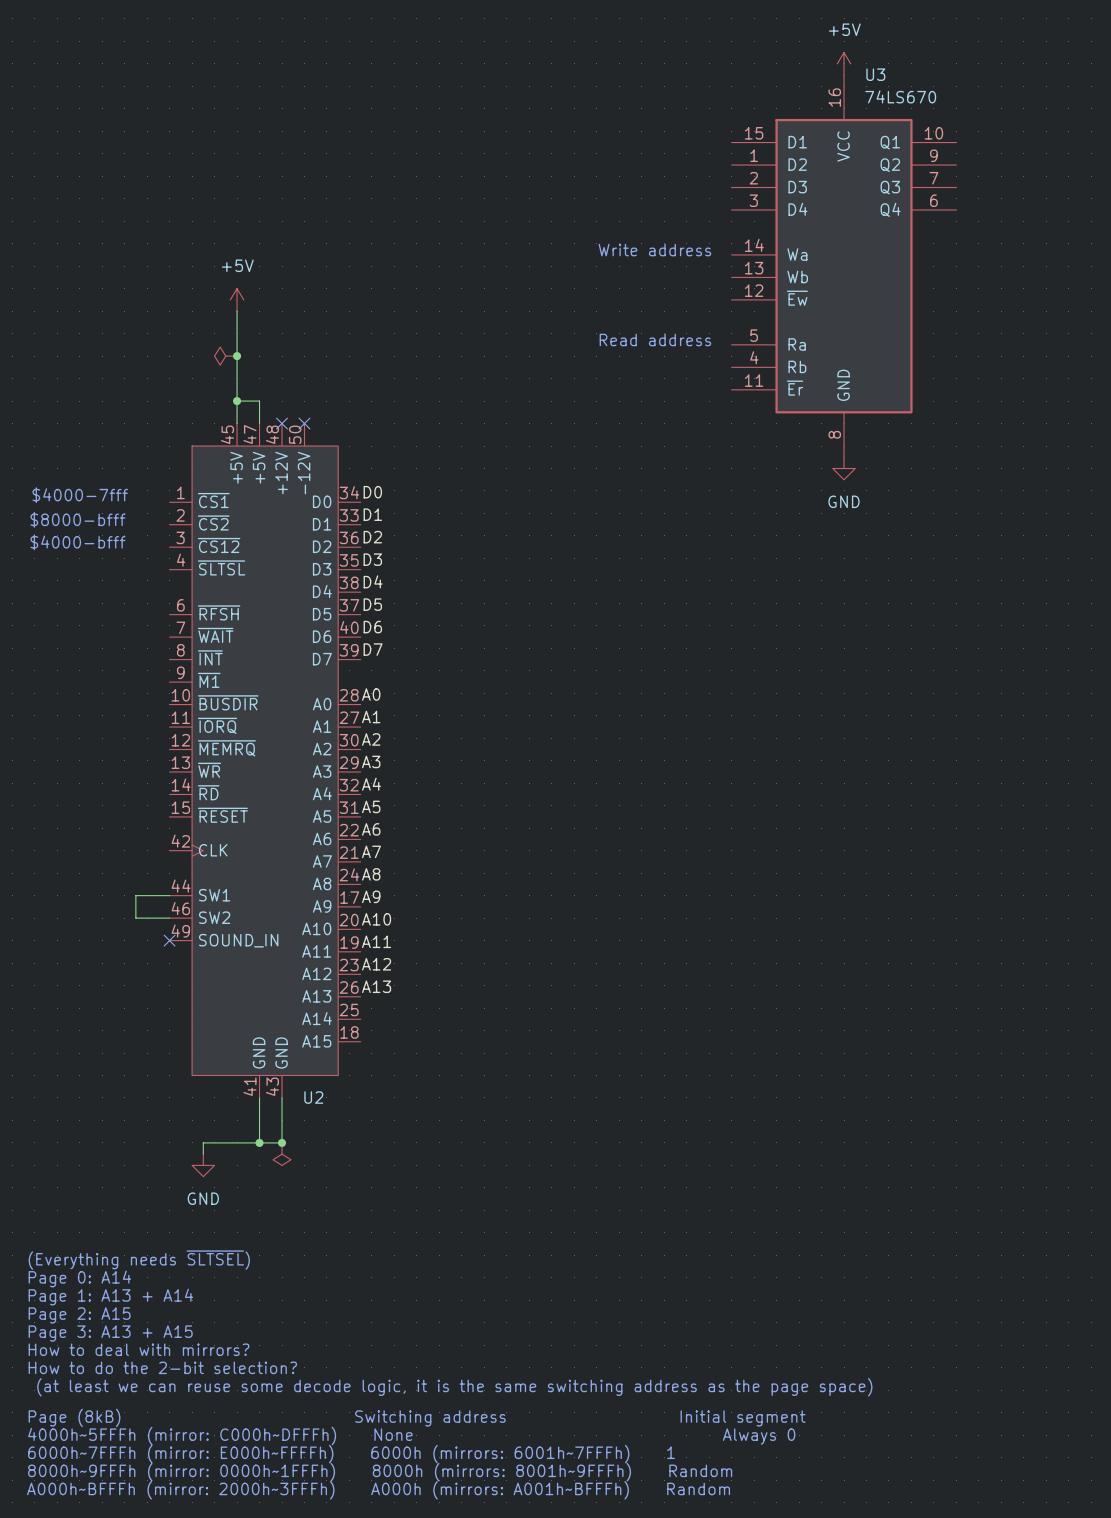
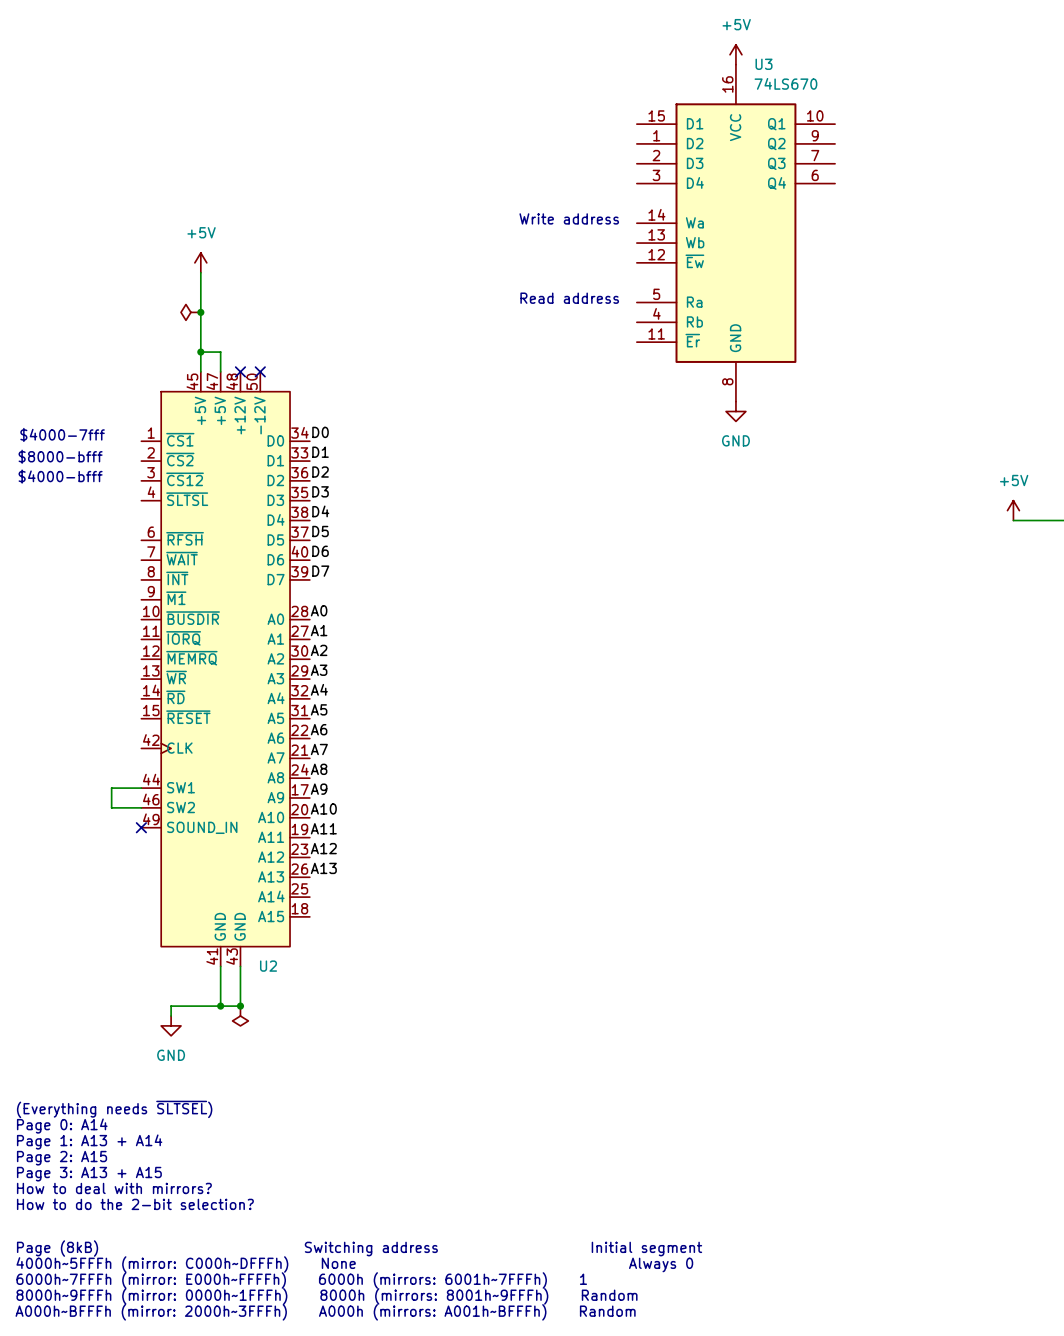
text: (at least we can reuse some decode logic, it is the same switching address as the page space) (454, 1387) -> none

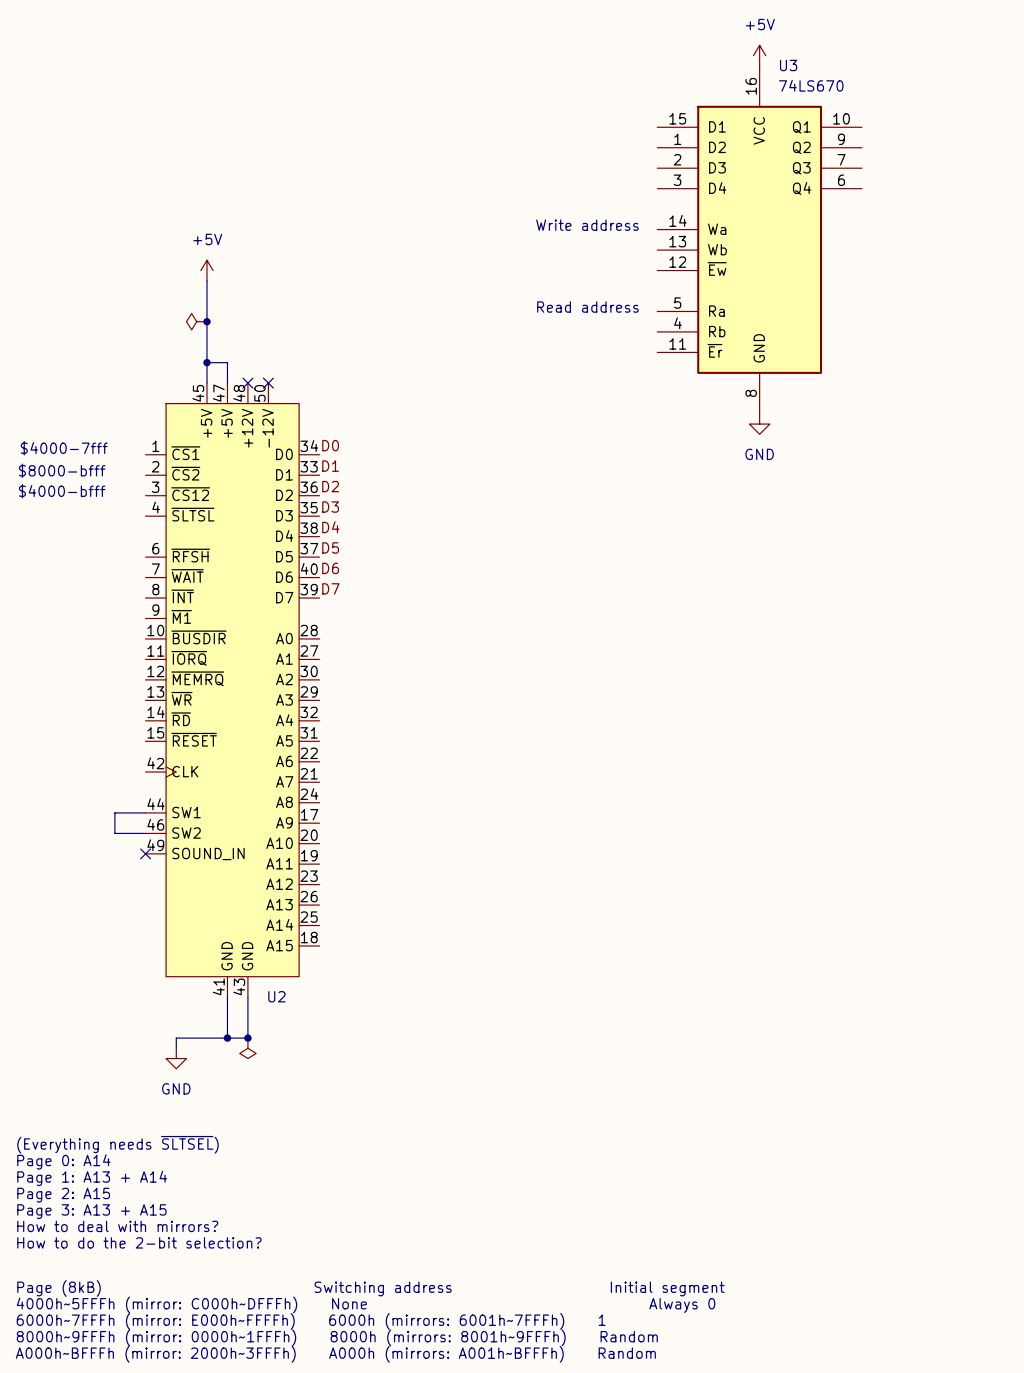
label: A0 (319, 610) -> none
label: A1 (319, 630) -> none
label: A2 (319, 650) -> none
label: A3 (319, 670) -> none
label: A4 (319, 689) -> none
label: A5 (319, 709) -> none
label: A6 (319, 729) -> none
label: A7 (319, 749) -> none
label: A8 (319, 769) -> none
label: A9 (319, 789) -> none
label: A10 (323, 808) -> none
label: A11 (323, 828) -> none
label: A12 (323, 848) -> none
label: A13 (323, 868) -> none

